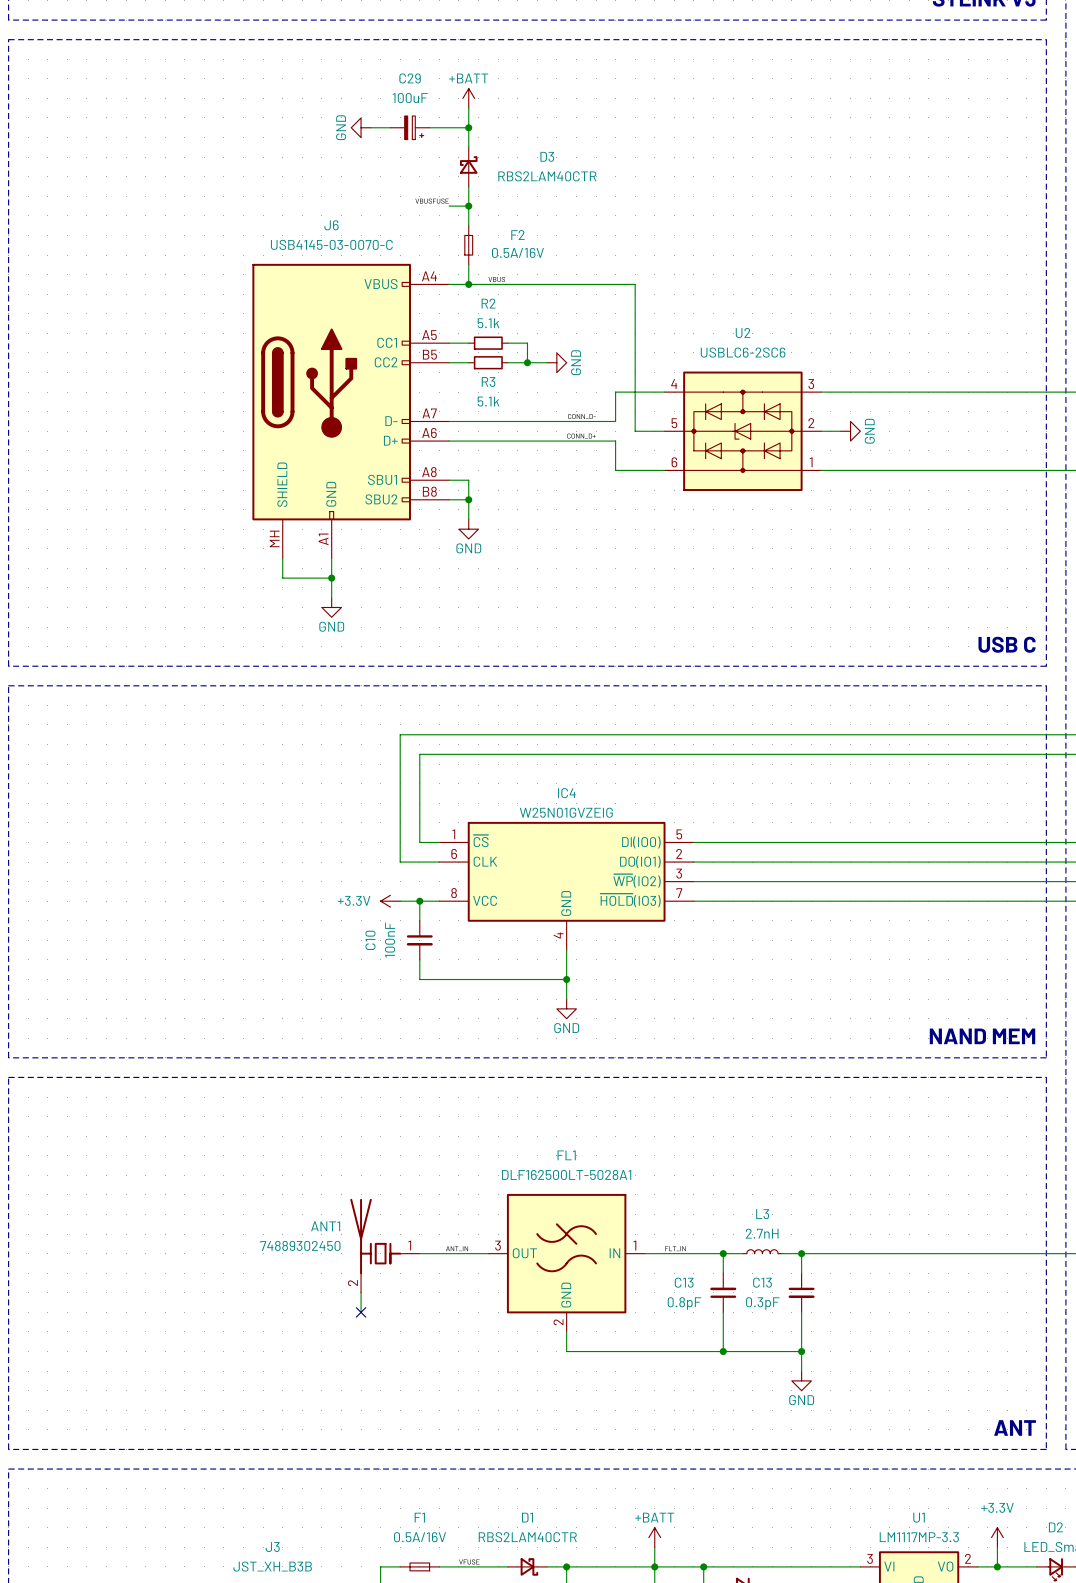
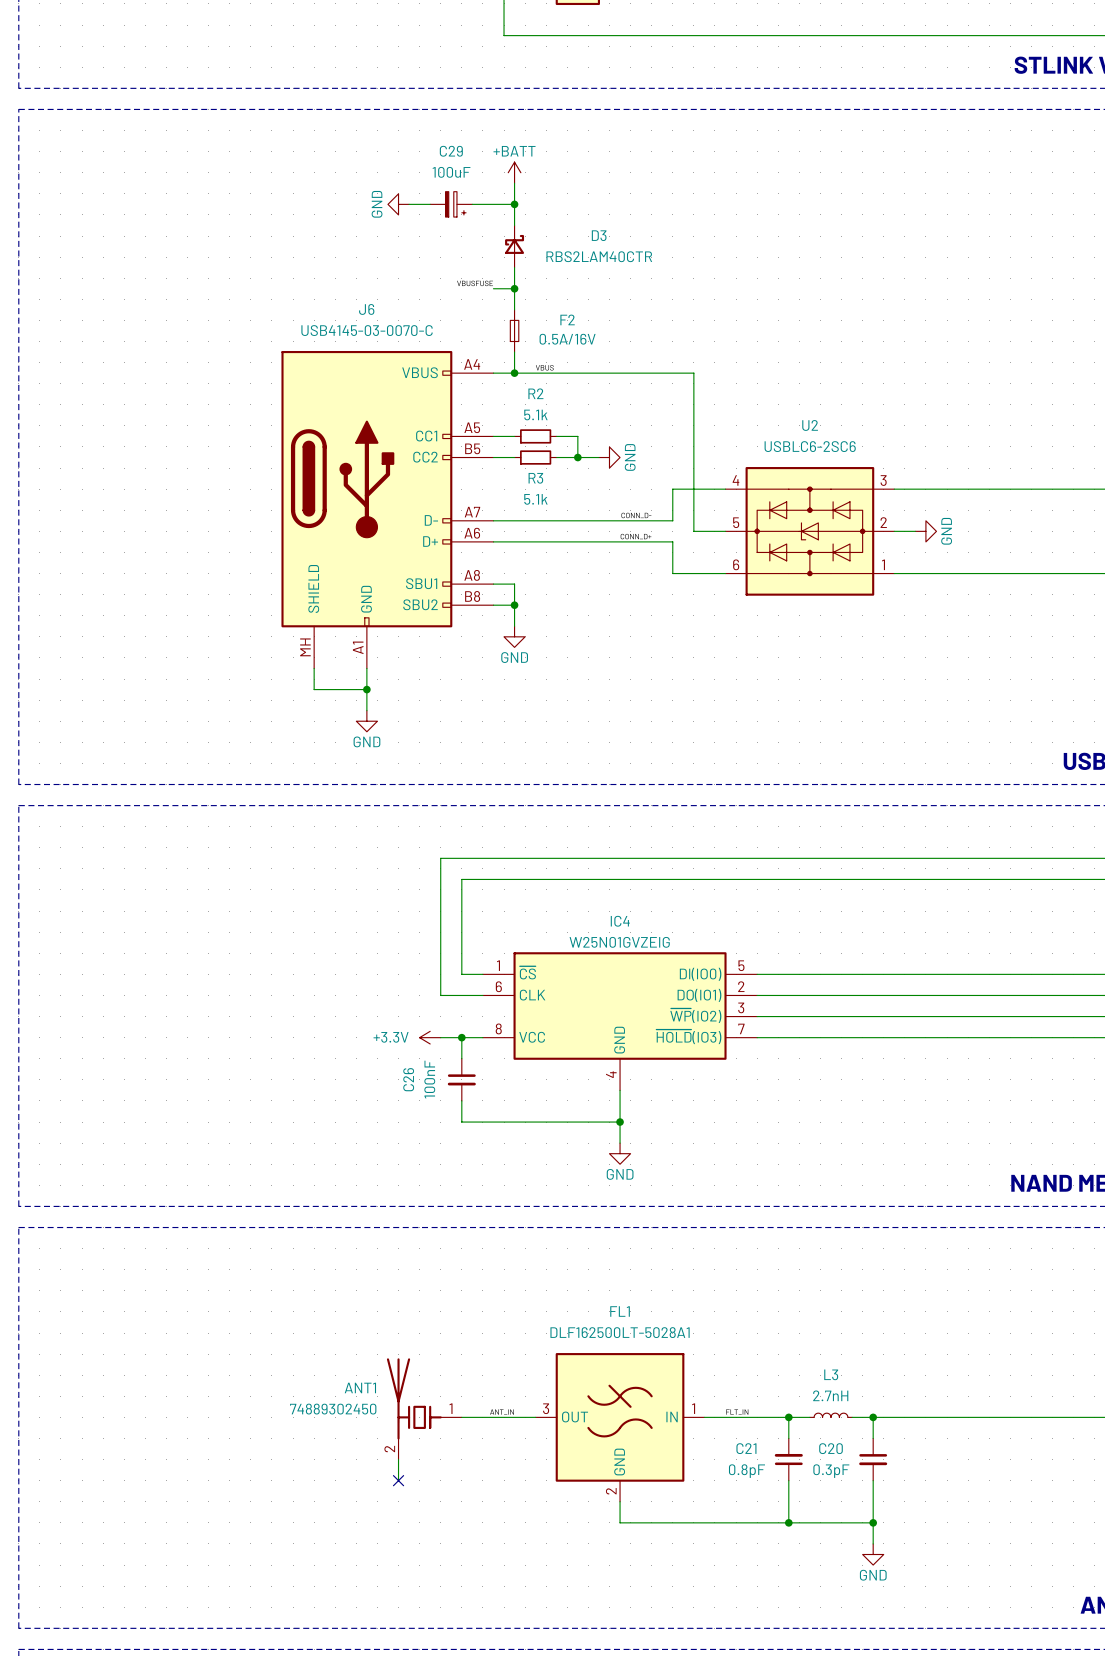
C10 name: C10 (370, 940) -> C26 (408, 1079)
C13 name: C13 (684, 1282) -> C21 (746, 1448)
C13 name: C13 (762, 1282) -> C20 (831, 1448)

